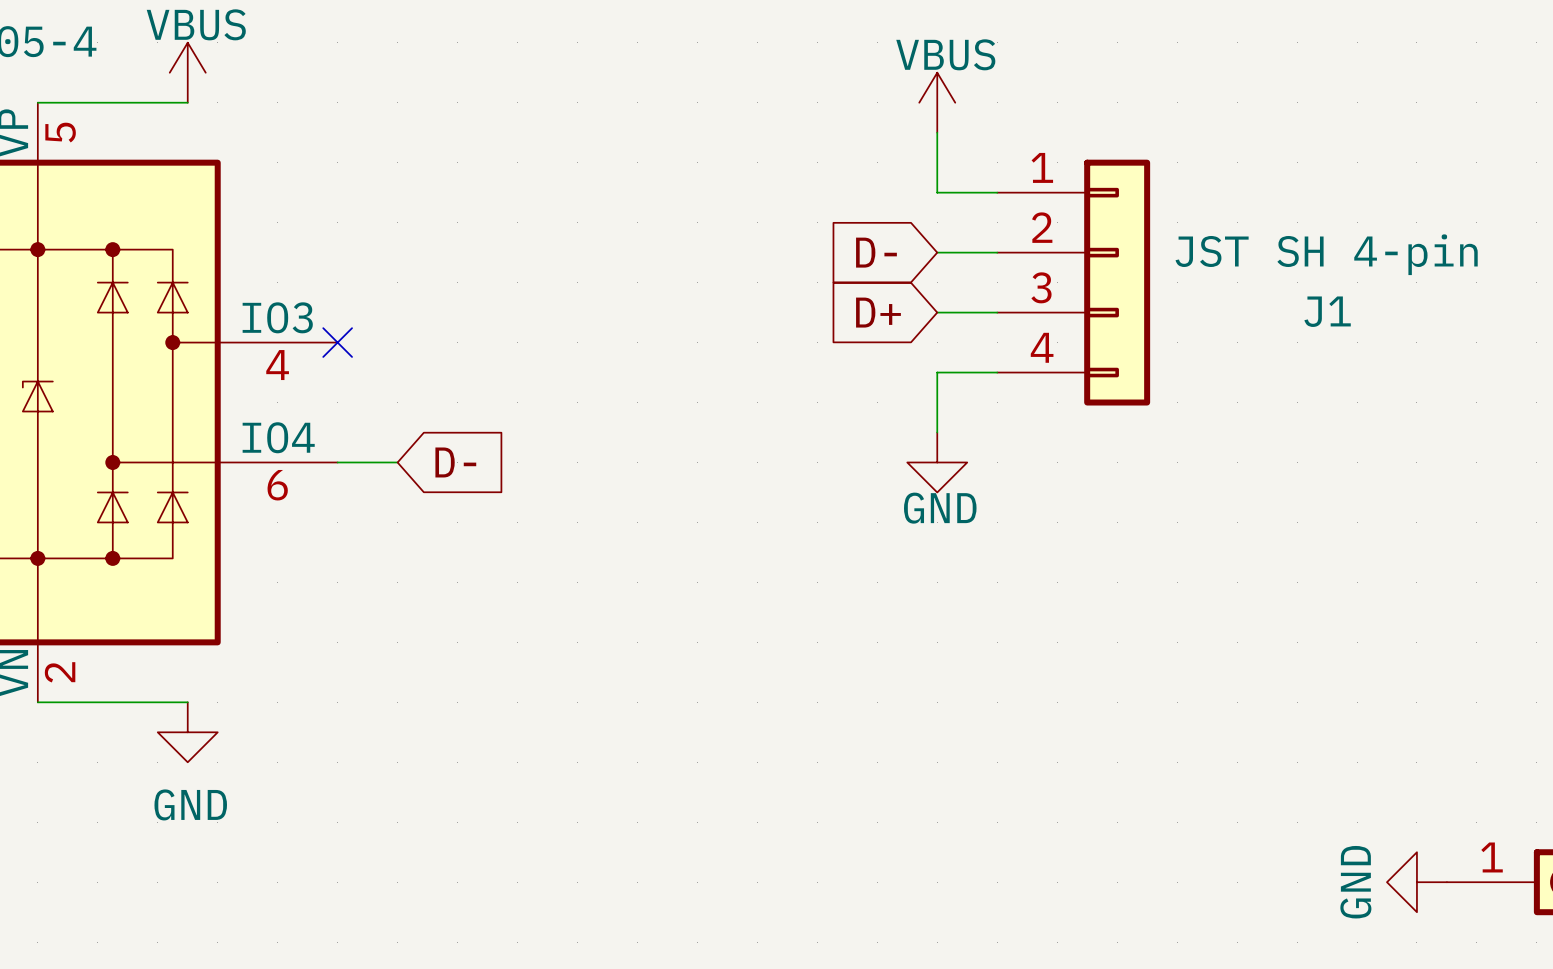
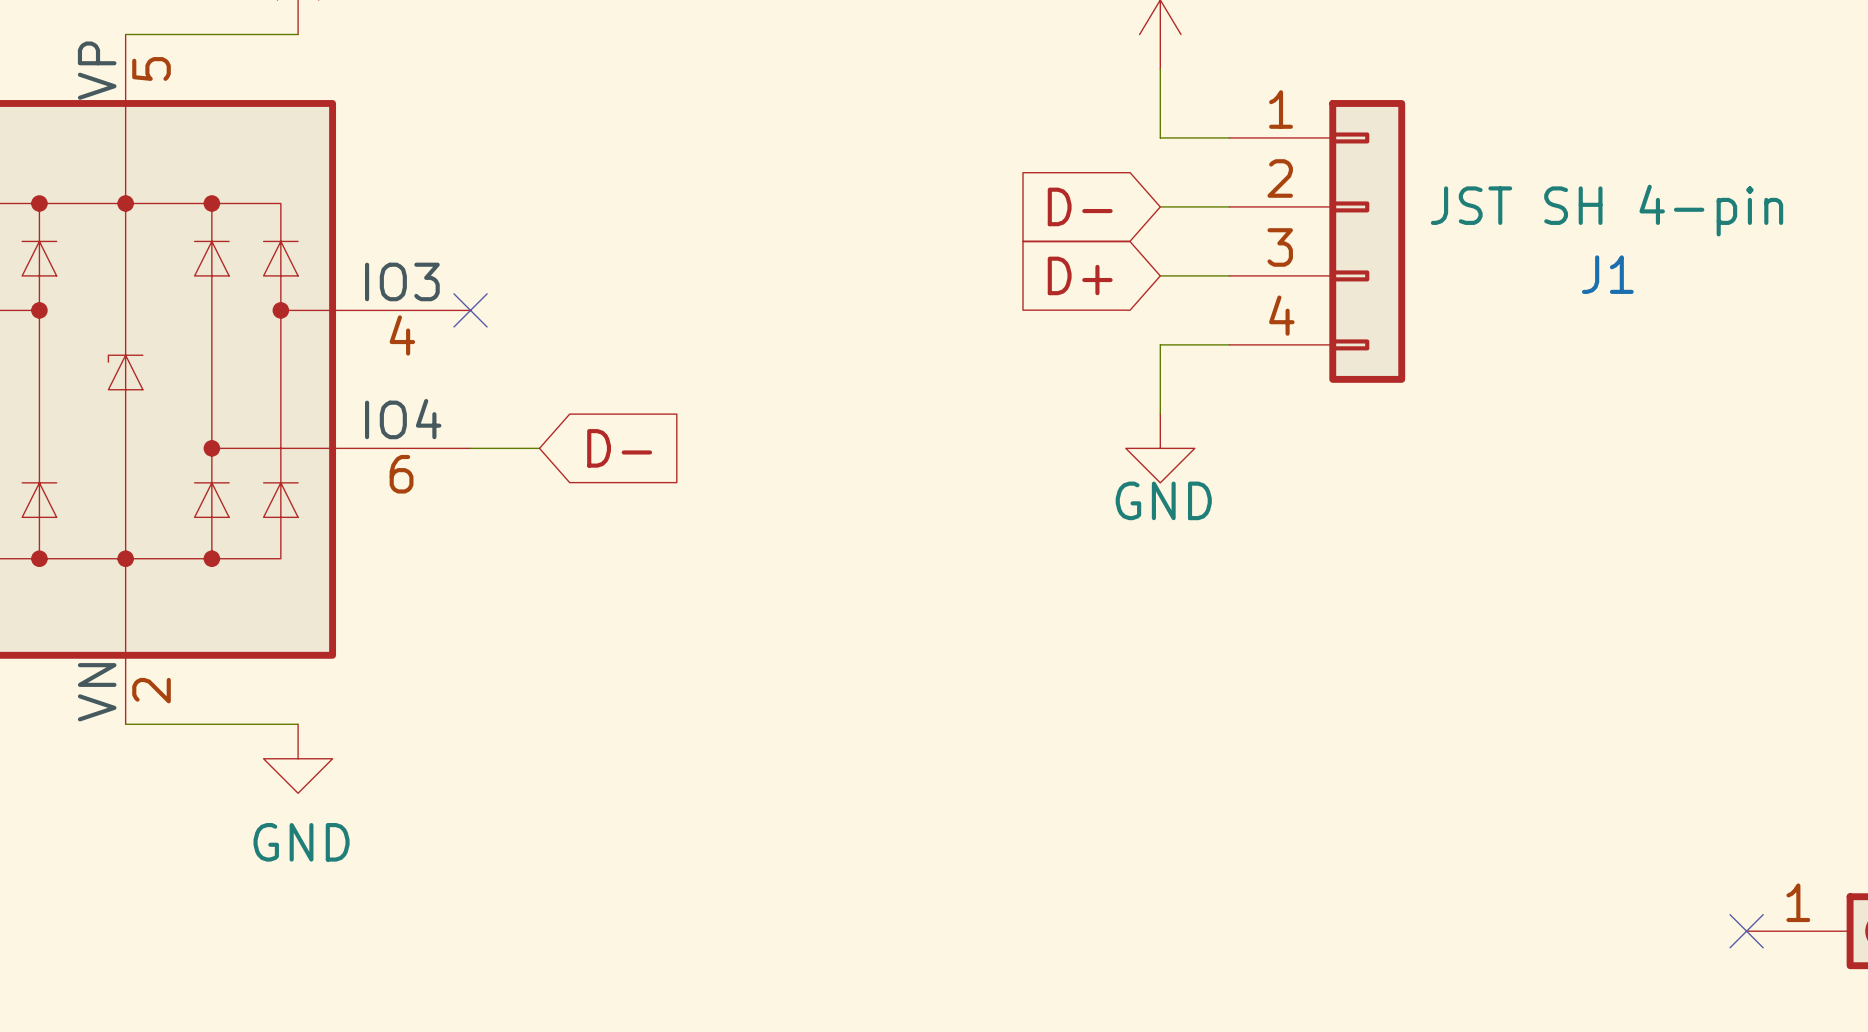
power symbol: GND (1416, 882) -> none
no-connect mark: none -> (1746, 931)

